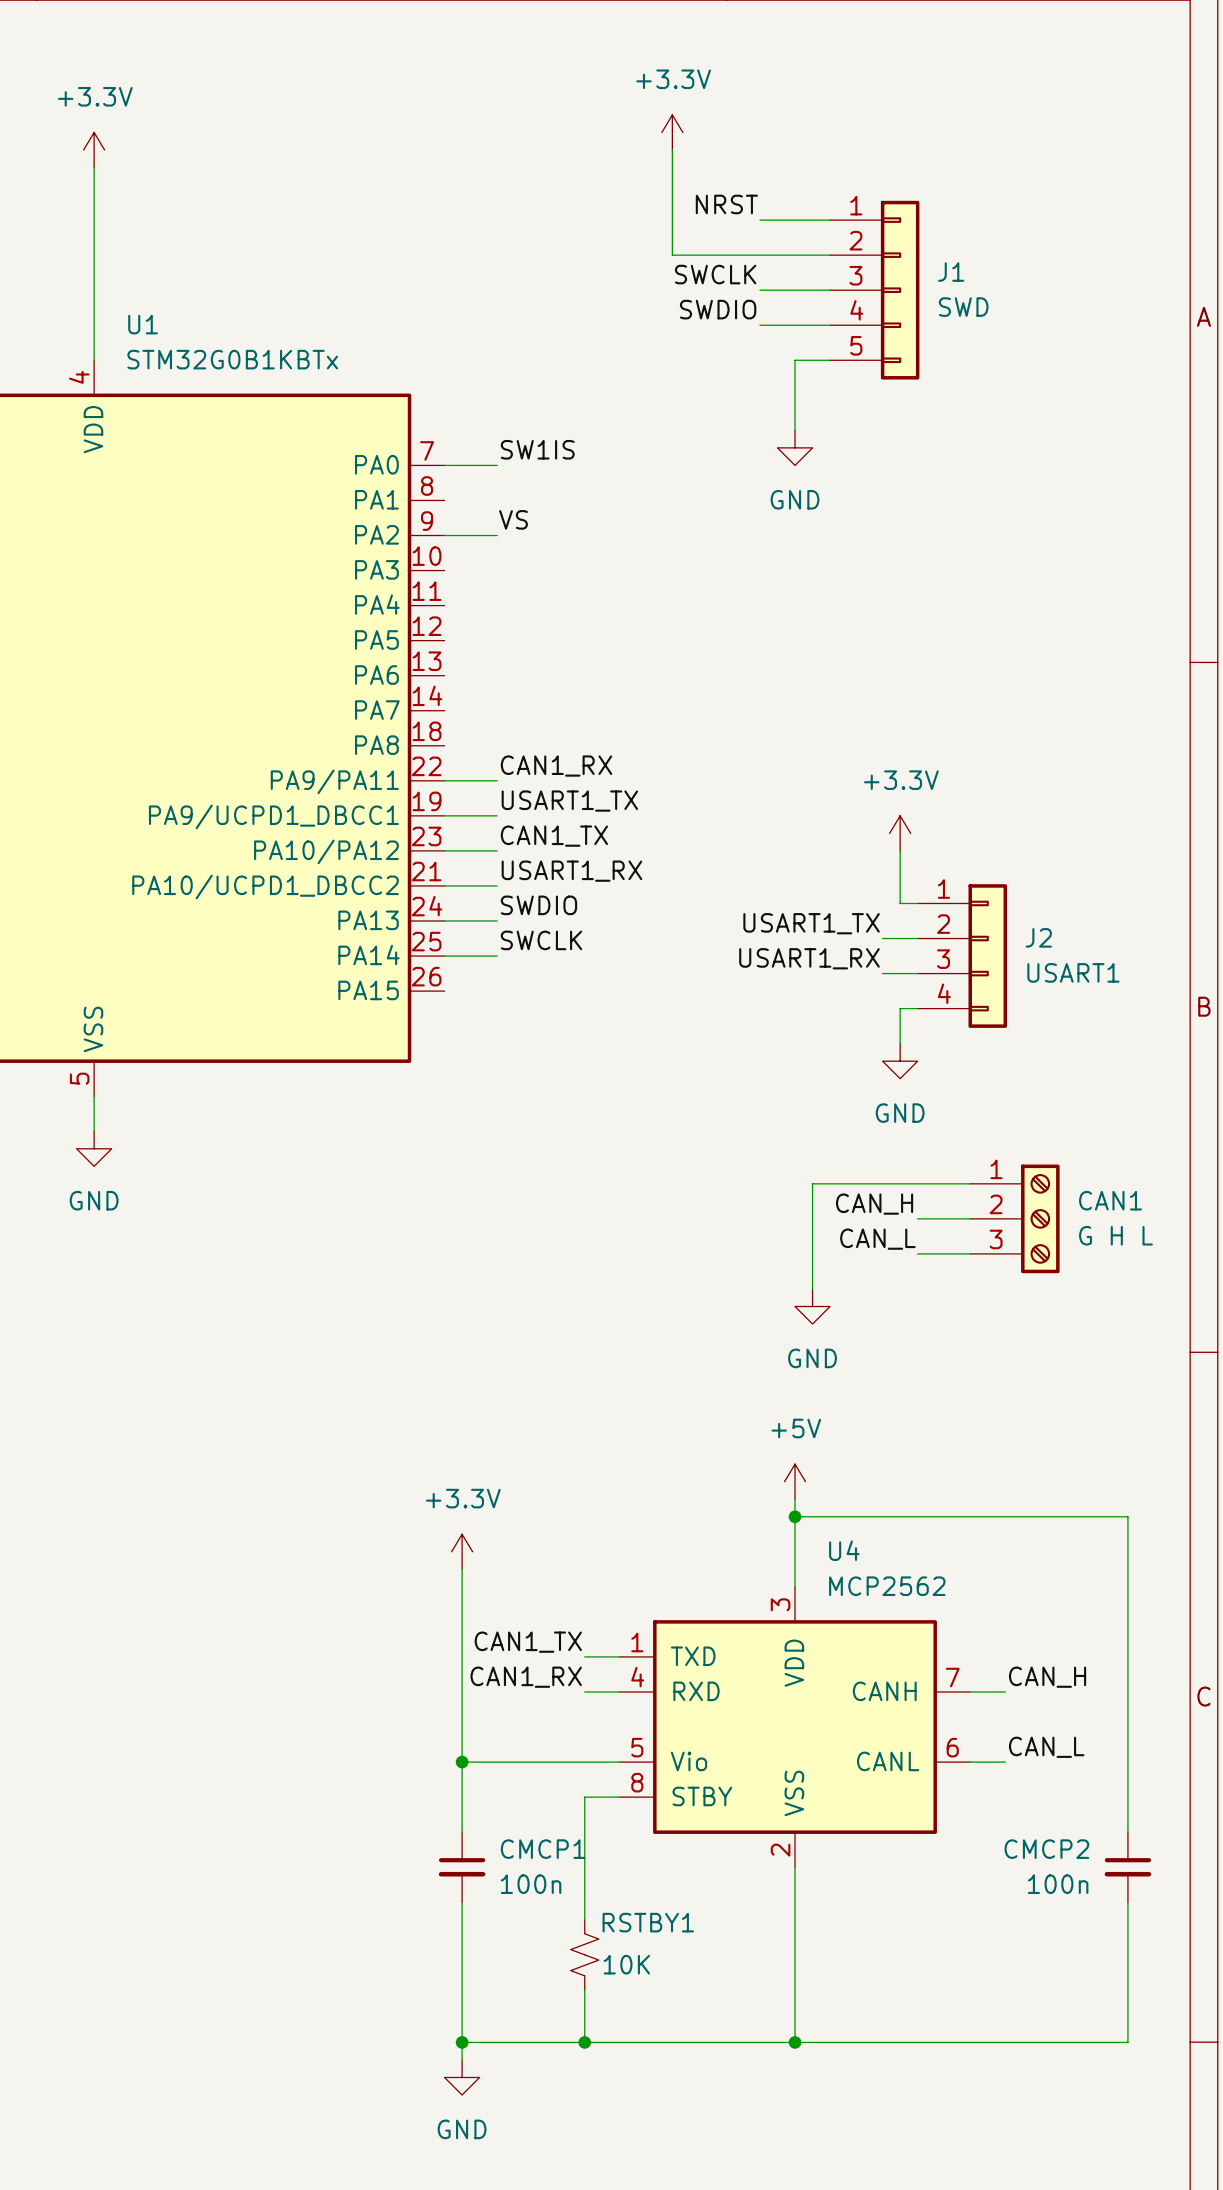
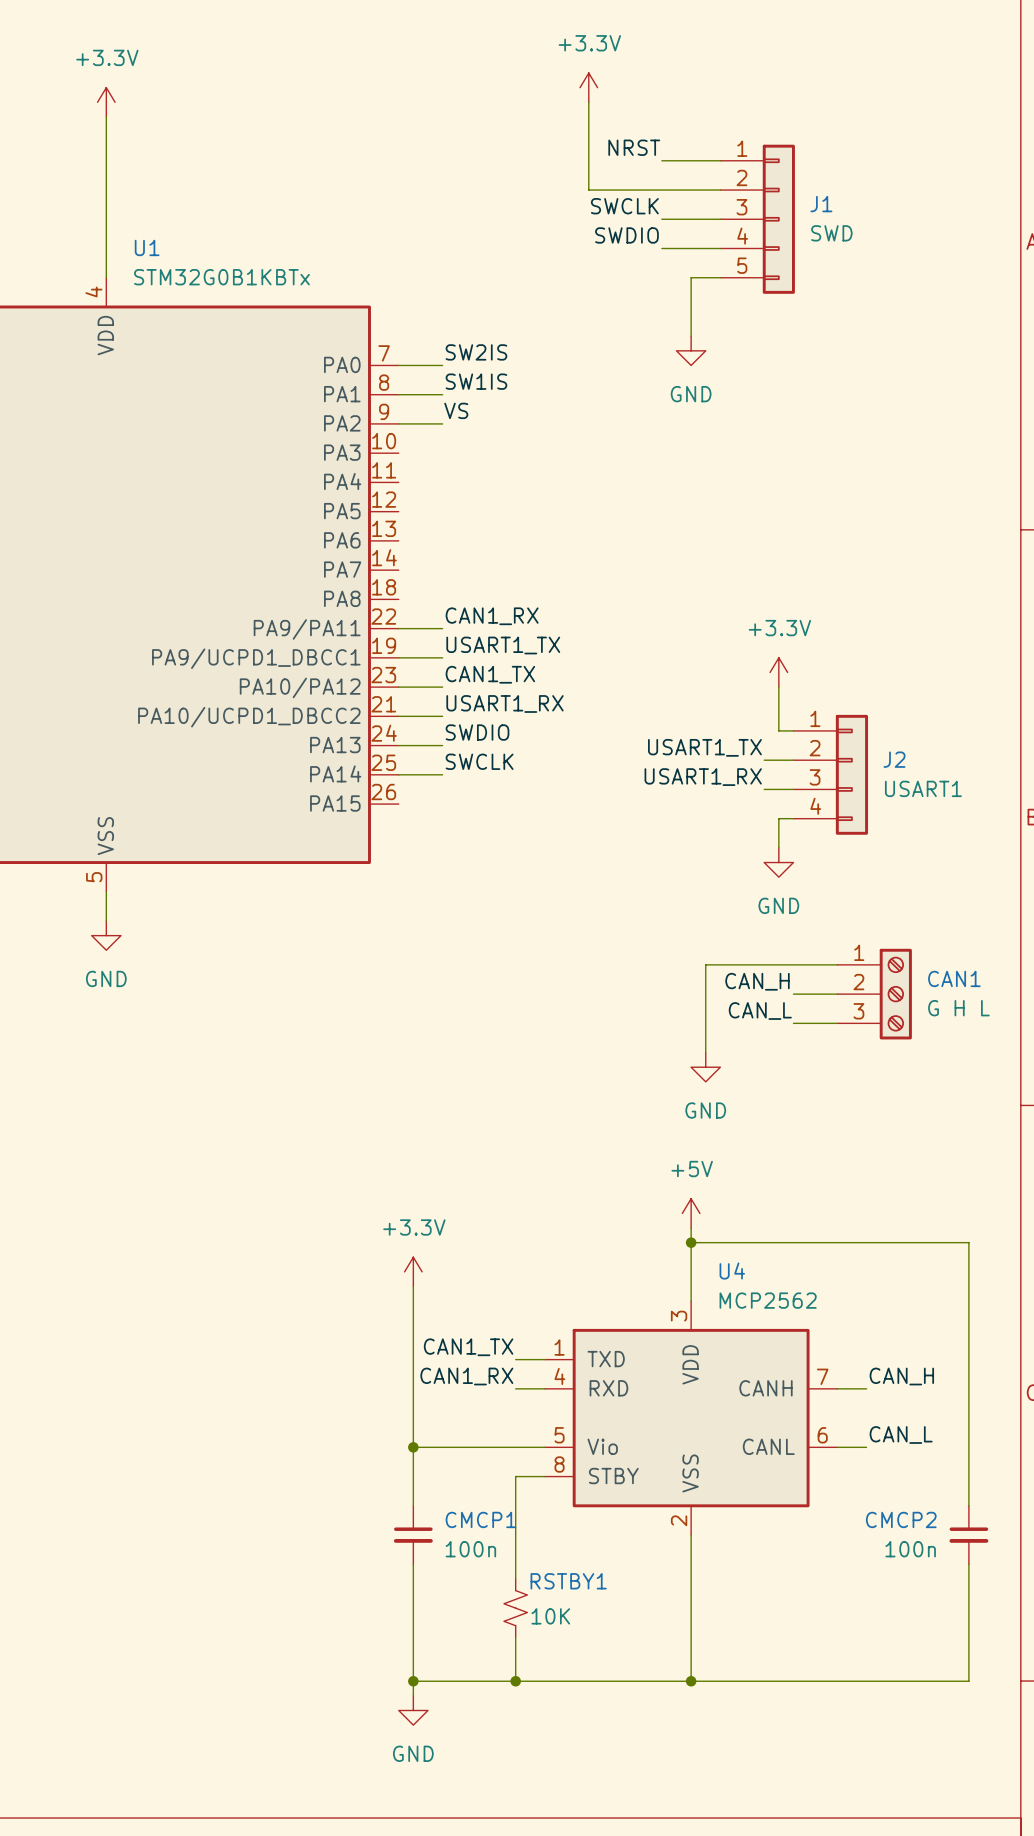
label: SW1IS (537, 449) -> SW2IS (476, 352)
label: none -> SW1IS (476, 381)
wire: none -> (398, 394) (442, 394)

